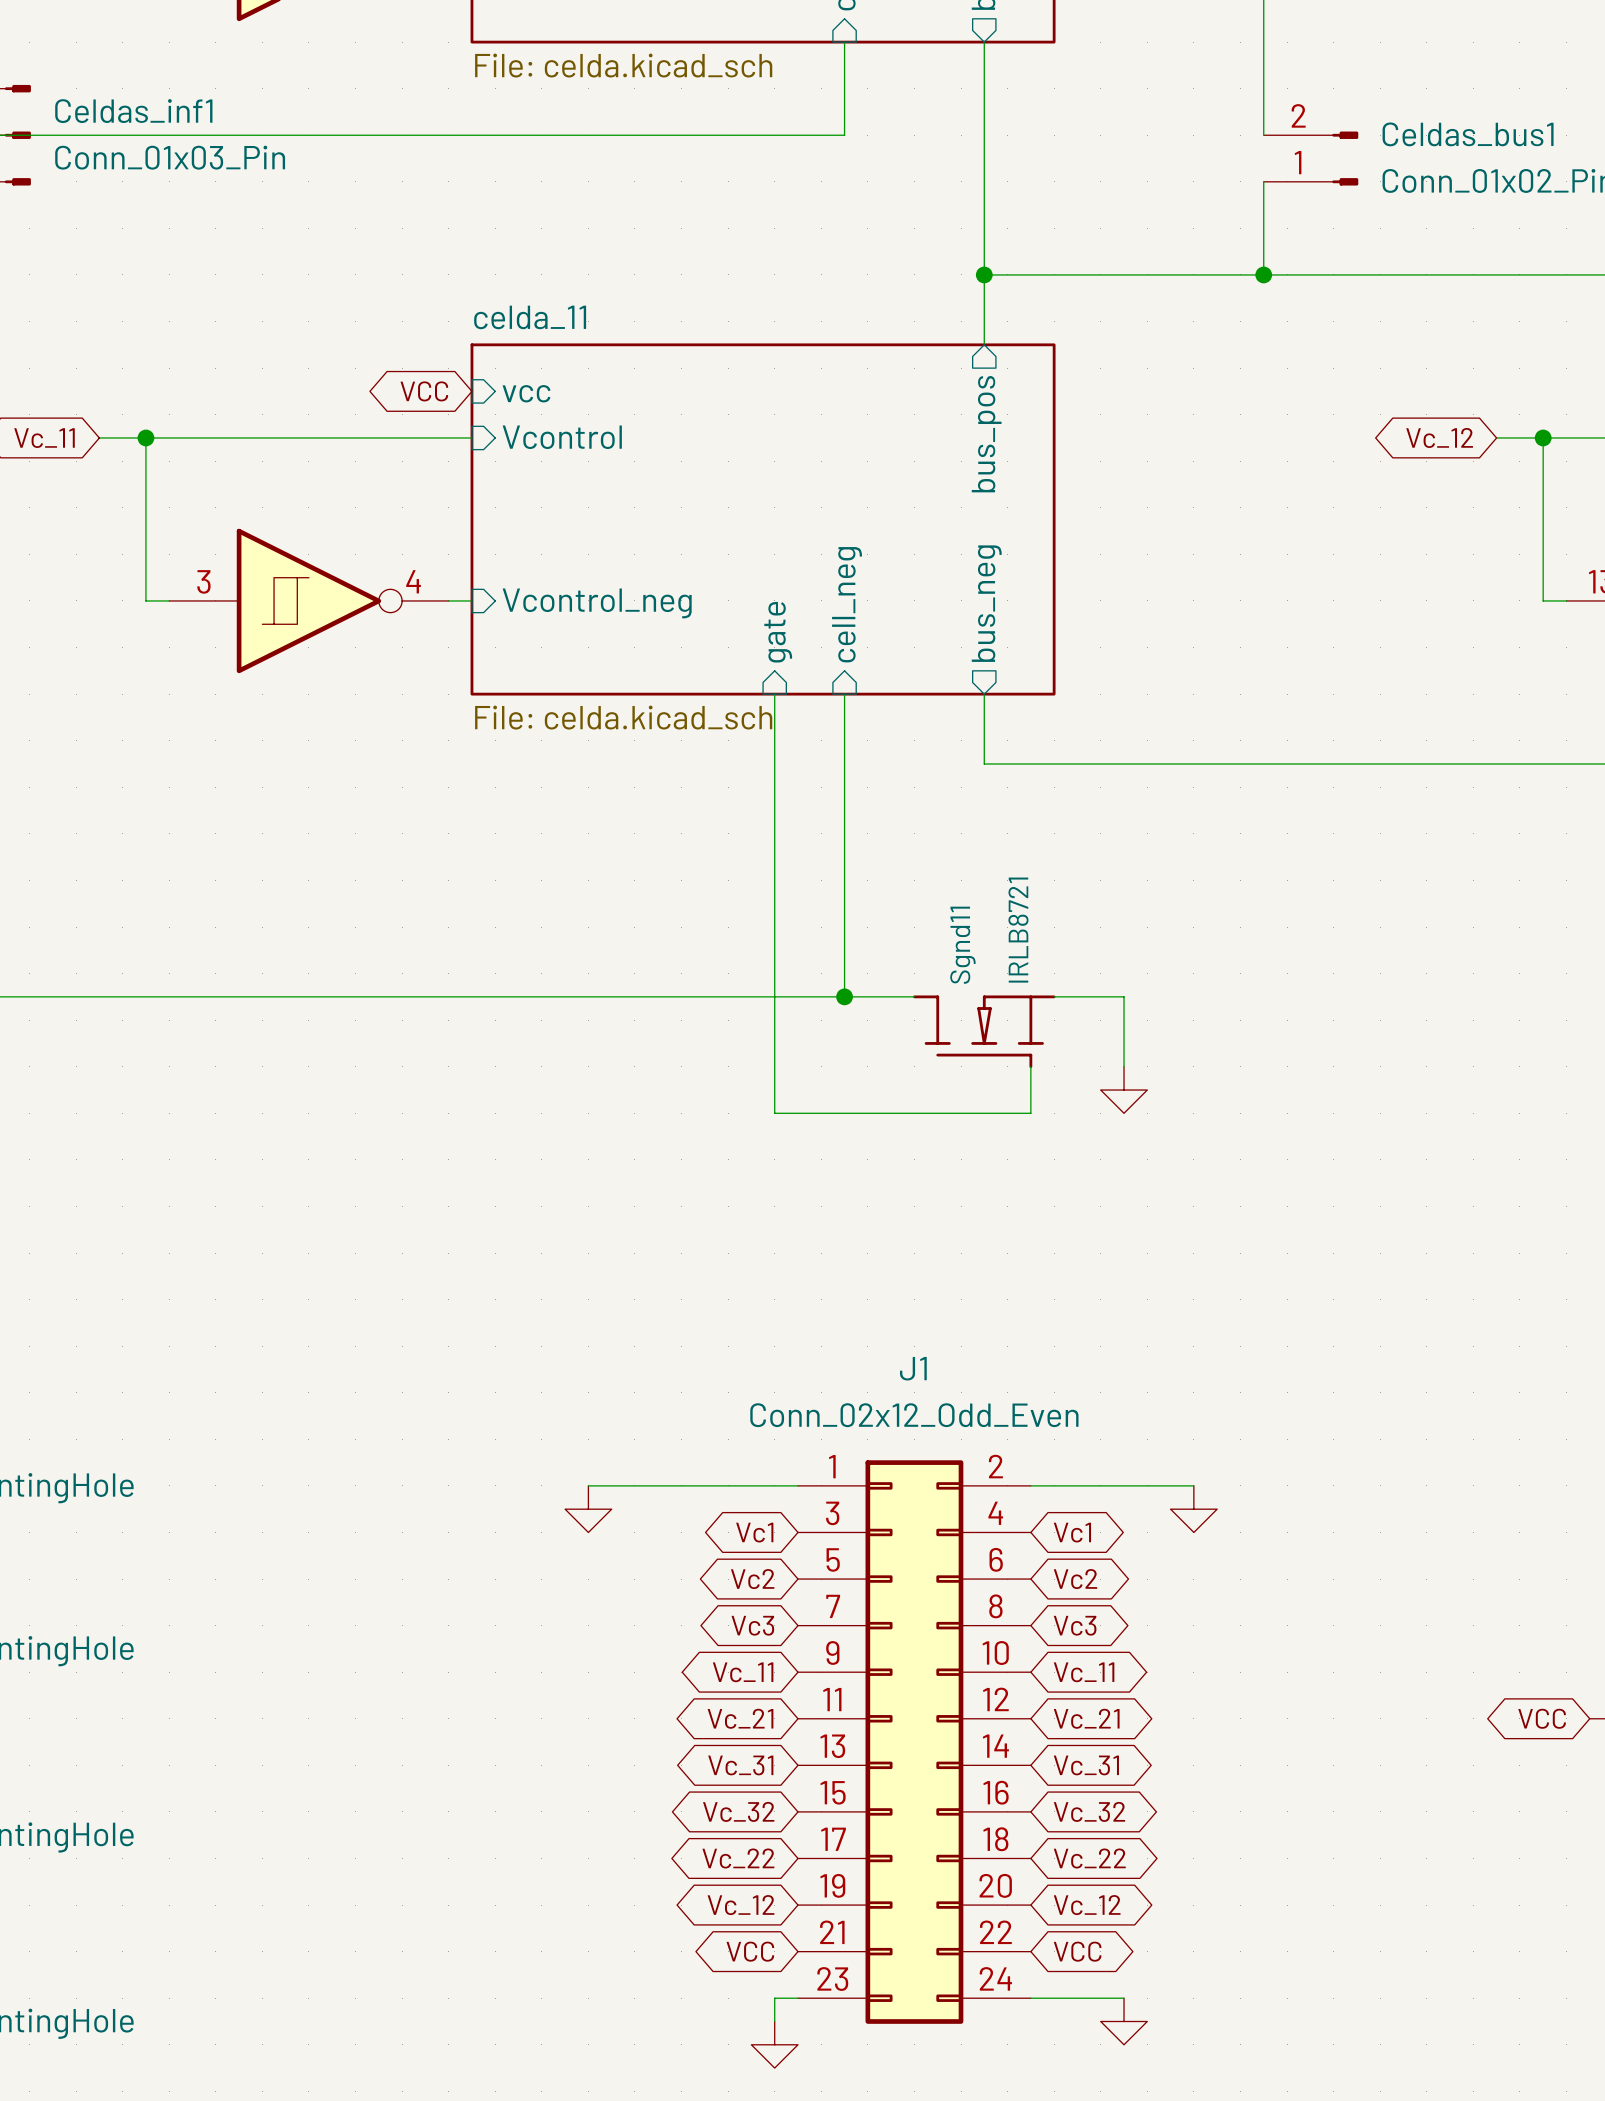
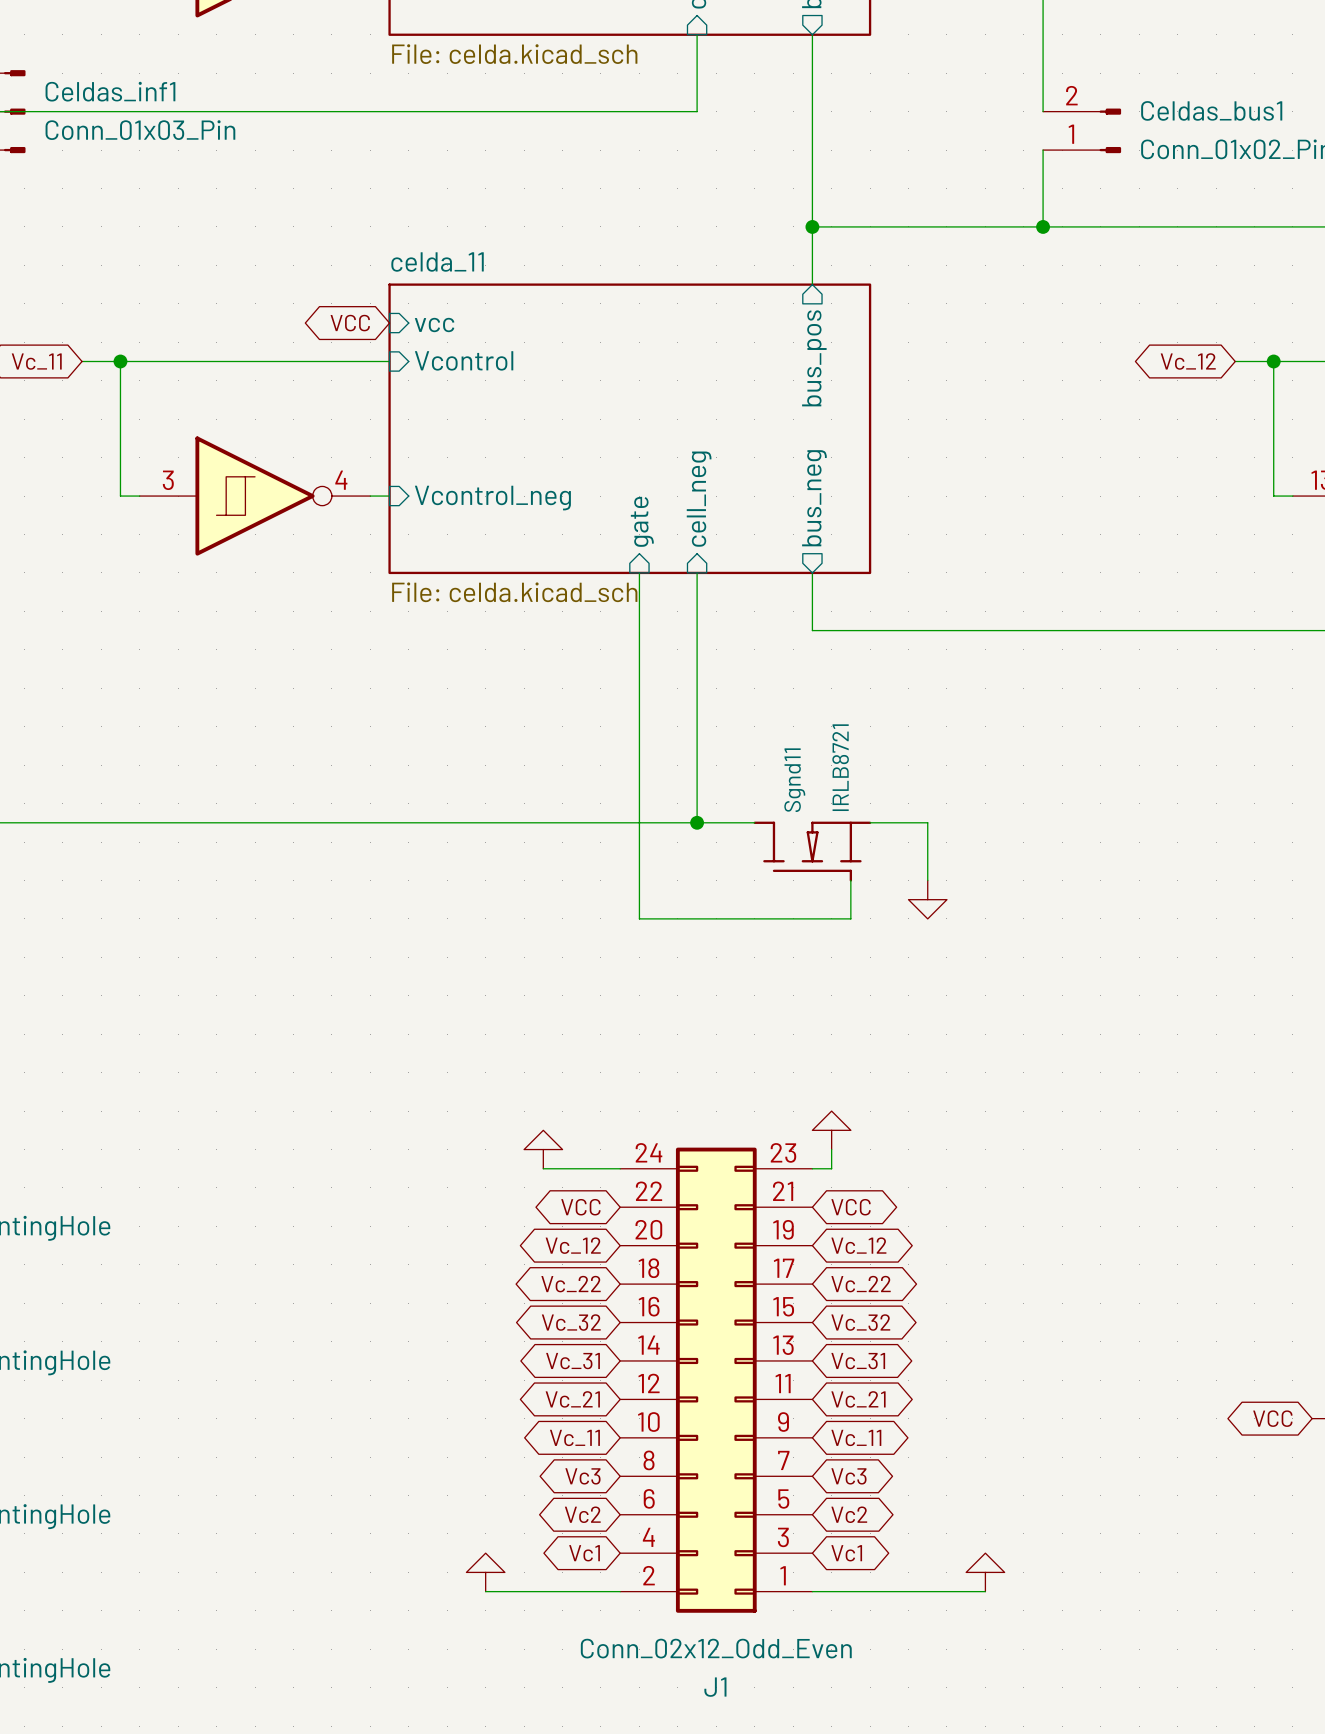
power symbol: none -> (831, 1130)
wire: none -> (831, 1149) (831, 1168) (812, 1168)
wire: none -> (543, 1168) (620, 1168)
global label: none -> VCC (580, 1207)
global label: none -> VCC (851, 1207)
wire: (588, 1485) (797, 1485) -> none
wire: (1030, 1485) (1193, 1485) -> none
power symbol rotation: 0° (588, 1509) -> 180° (543, 1149)
power symbol position: (588, 1509) -> (543, 1149)
power symbol: (1193, 1509) -> none
global label: Vc1 (754, 1532) -> Vc_12 (573, 1245)
global label: Vc1 (1072, 1532) -> Vc_12 (858, 1245)
global label: none -> Vc_22 (571, 1284)
global label: none -> Vc_22 (861, 1284)
global label: Vc2 (752, 1579) -> none
global label: Vc2 (1075, 1579) -> none
global label: none -> Vc_32 (571, 1322)
global label: none -> Vc_32 (860, 1322)
global label: Vc3 (752, 1625) -> none
global label: Vc3 (1075, 1625) -> none
global label: none -> Vc_31 (573, 1361)
global label: none -> Vc_31 (858, 1361)
global label position: Vc_11 (743, 1672) -> Vc_11 (574, 1437)
global label position: Vc_11 (1084, 1672) -> Vc_11 (856, 1437)
global label position: Vc_21 (740, 1718) -> Vc_21 (572, 1399)
global label position: Vc_21 (1086, 1718) -> Vc_21 (858, 1399)
J1 rotation: 0° (914, 1742) -> 180° (716, 1380)
global label: Vc_31 (740, 1765) -> none
global label: Vc_31 (1086, 1765) -> none
global label: none -> Vc3 (582, 1476)
global label: none -> Vc3 (848, 1476)
global label: Vc_32 (738, 1811) -> none
global label: Vc_32 (1089, 1811) -> none
global label: none -> Vc2 (582, 1514)
global label: none -> Vc2 (849, 1514)
global label: Vc_22 (738, 1858) -> none
global label: Vc_22 (1089, 1858) -> none
power symbol: none -> (485, 1572)
global label: Vc_12 (741, 1905) -> Vc1 (584, 1553)
global label: Vc_12 (1087, 1905) -> Vc1 (846, 1553)
wire: none -> (485, 1591) (620, 1591)
wire: none -> (812, 1591) (985, 1591)
global label: VCC (750, 1951) -> none
global label: VCC (1077, 1951) -> none
wire: (797, 1998) (774, 1998) (774, 2021) -> none
wire: (1030, 1998) (1124, 1998) -> none
power symbol rotation: 0° (1124, 2021) -> 180° (985, 1572)
power symbol position: (1124, 2021) -> (985, 1572)
power symbol: (774, 2044) -> none

